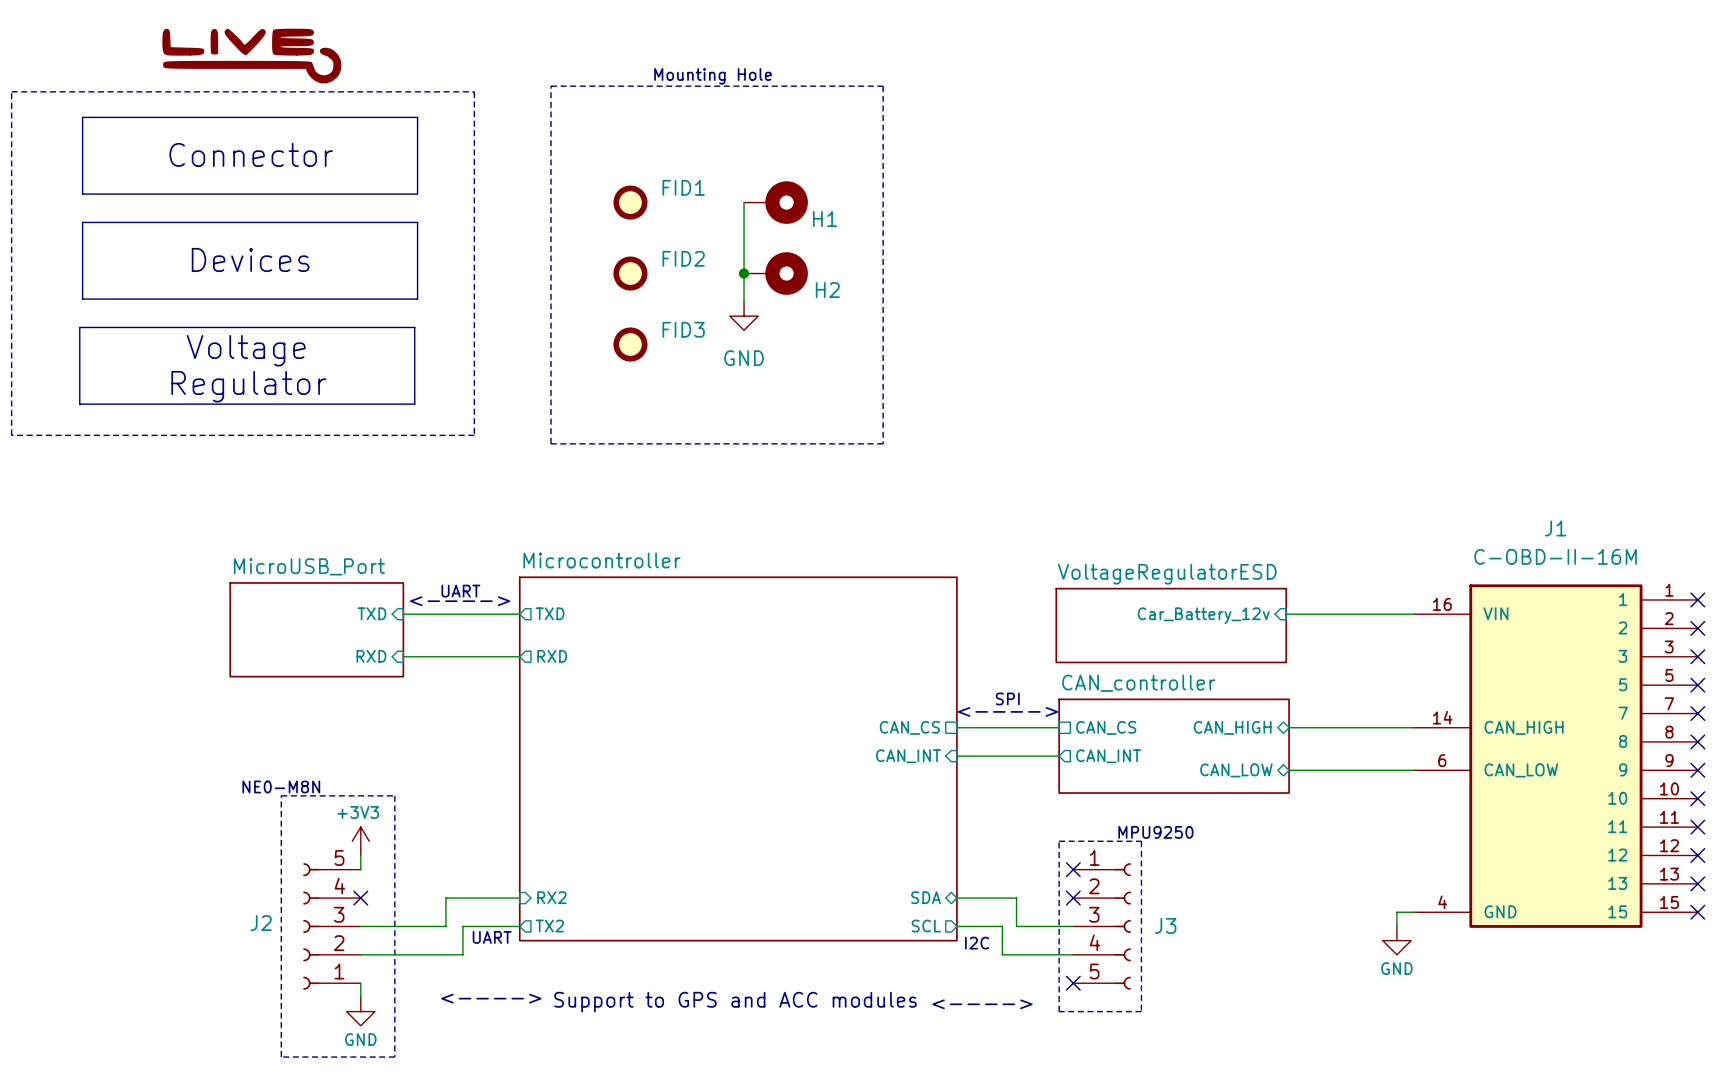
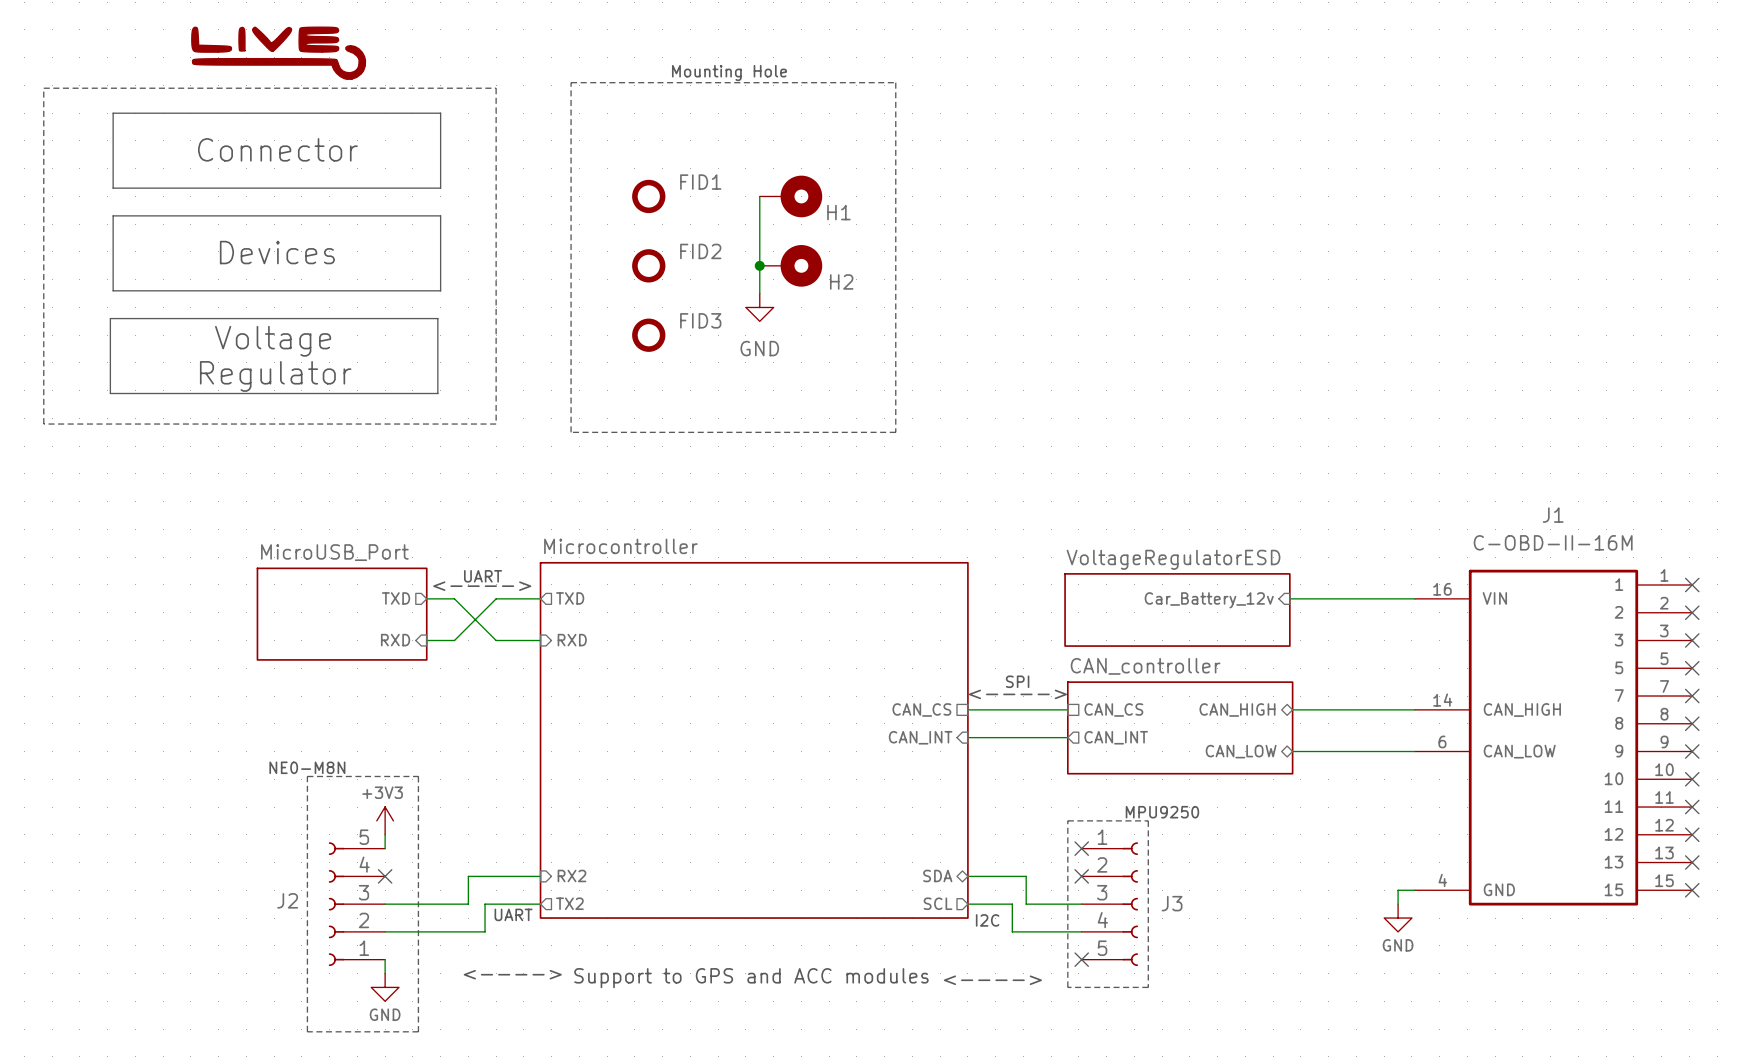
sheet pin shape: input (371, 613) -> output (396, 598)
wire: (431, 614) (474, 614) -> (454, 598) (496, 640)
wire: (431, 656) (474, 656) -> (454, 640) (496, 598)
sheet pin shape: output (552, 656) -> input (572, 640)

